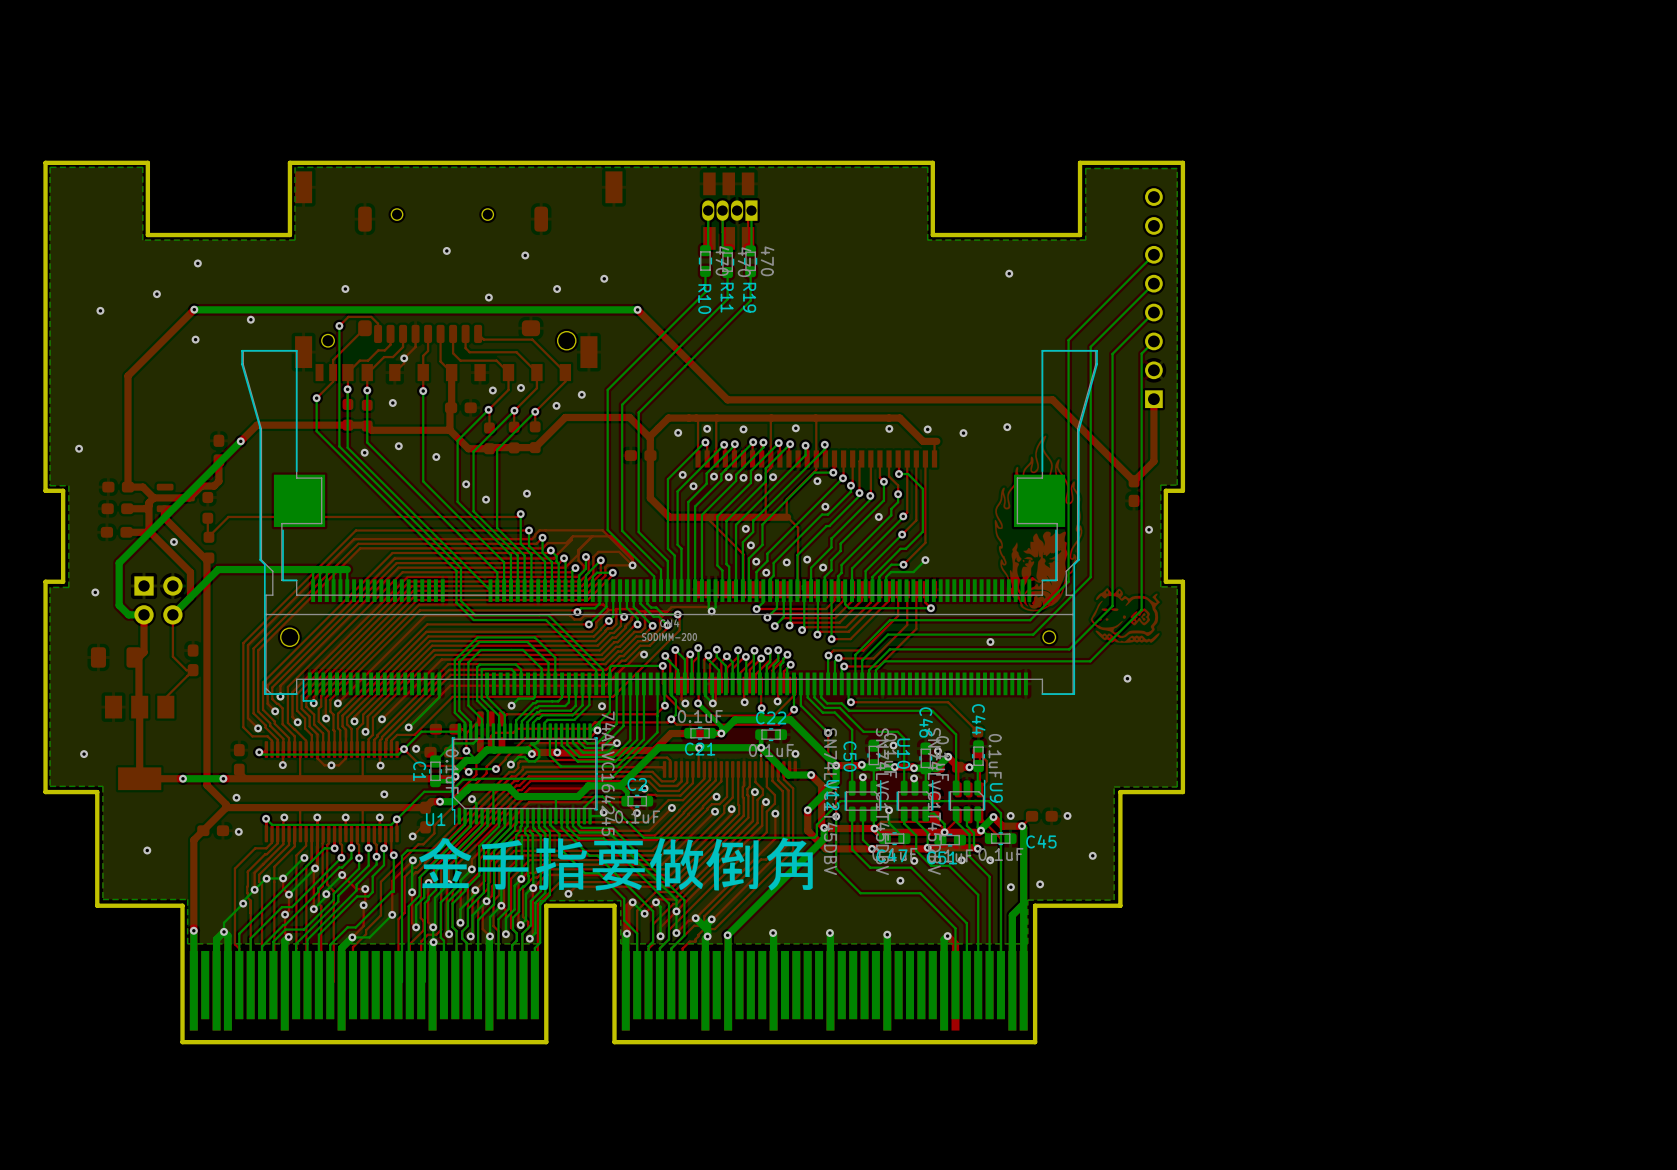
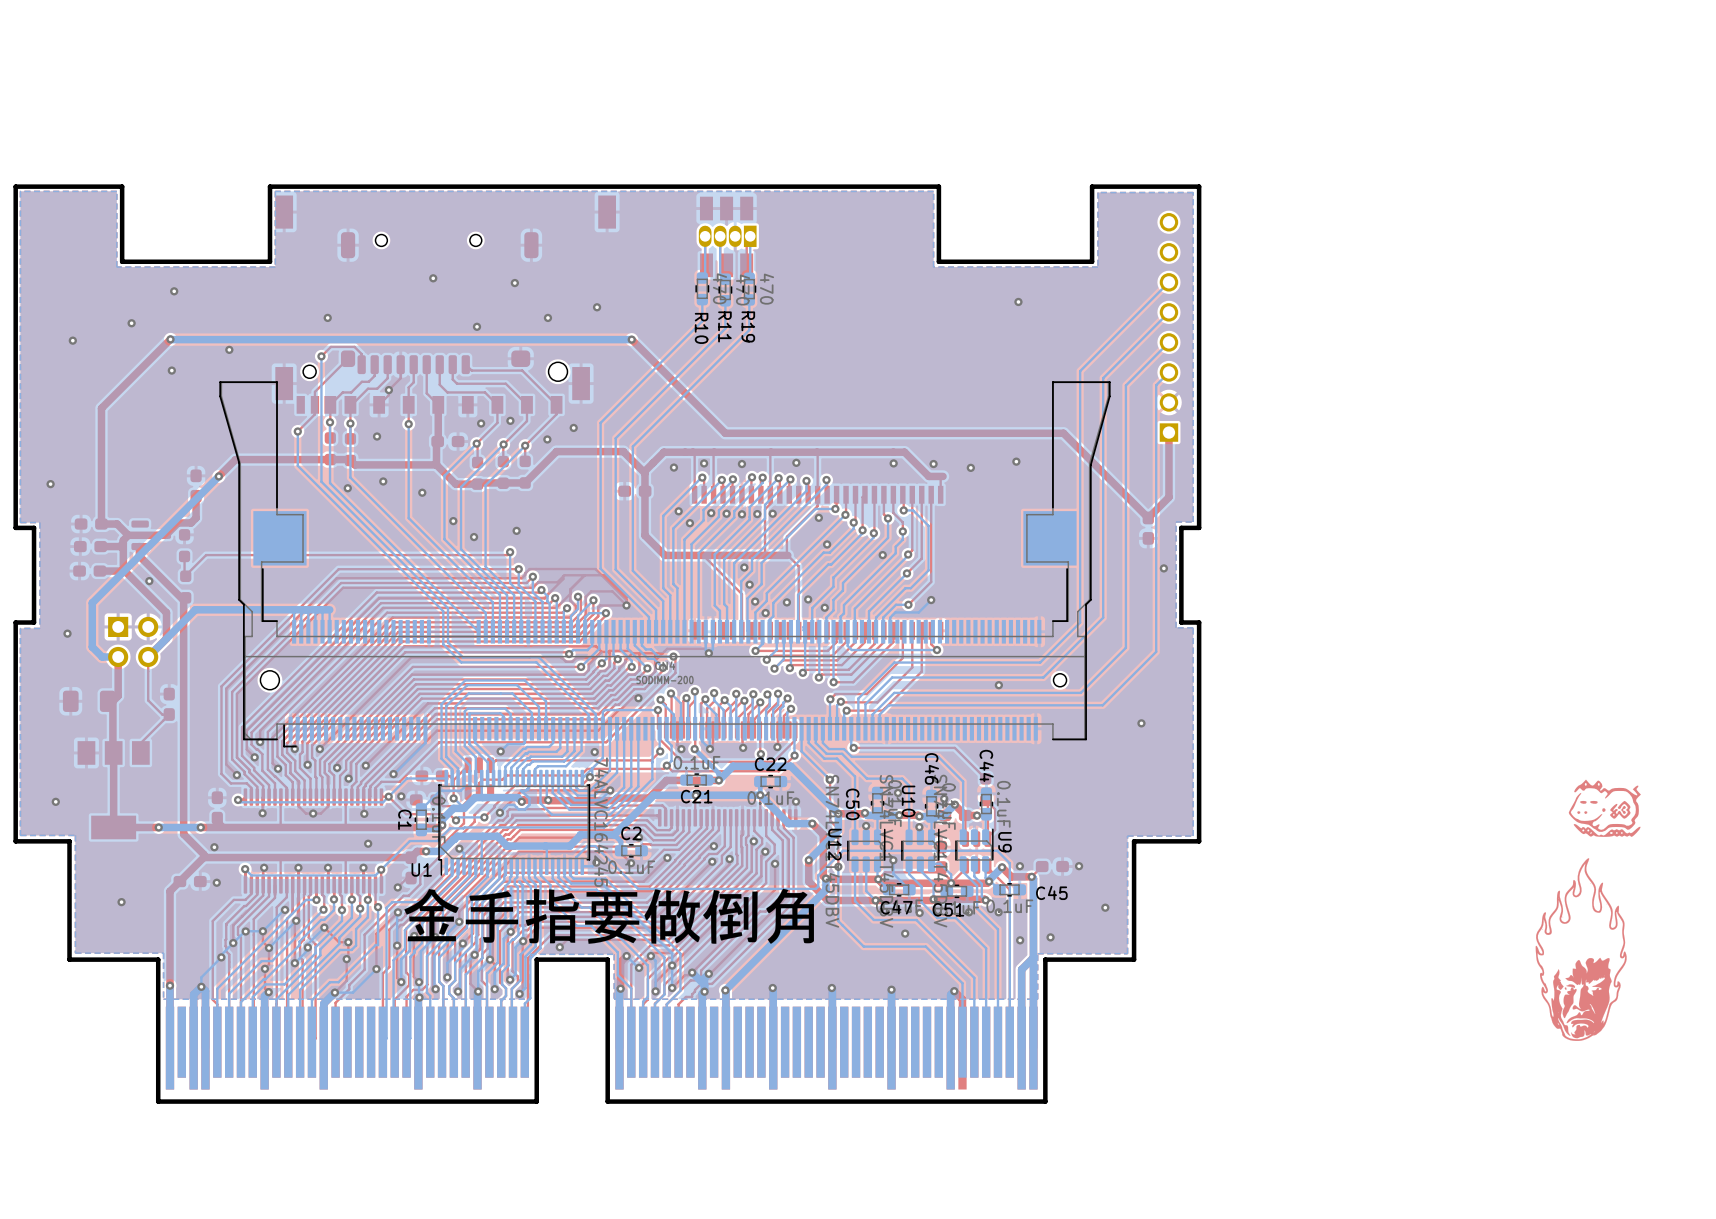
drawing: [994, 435, 1161, 643] -> none
drawing: none -> [1568, 779, 1641, 837]
drawing: none -> [1535, 858, 1627, 1041]

